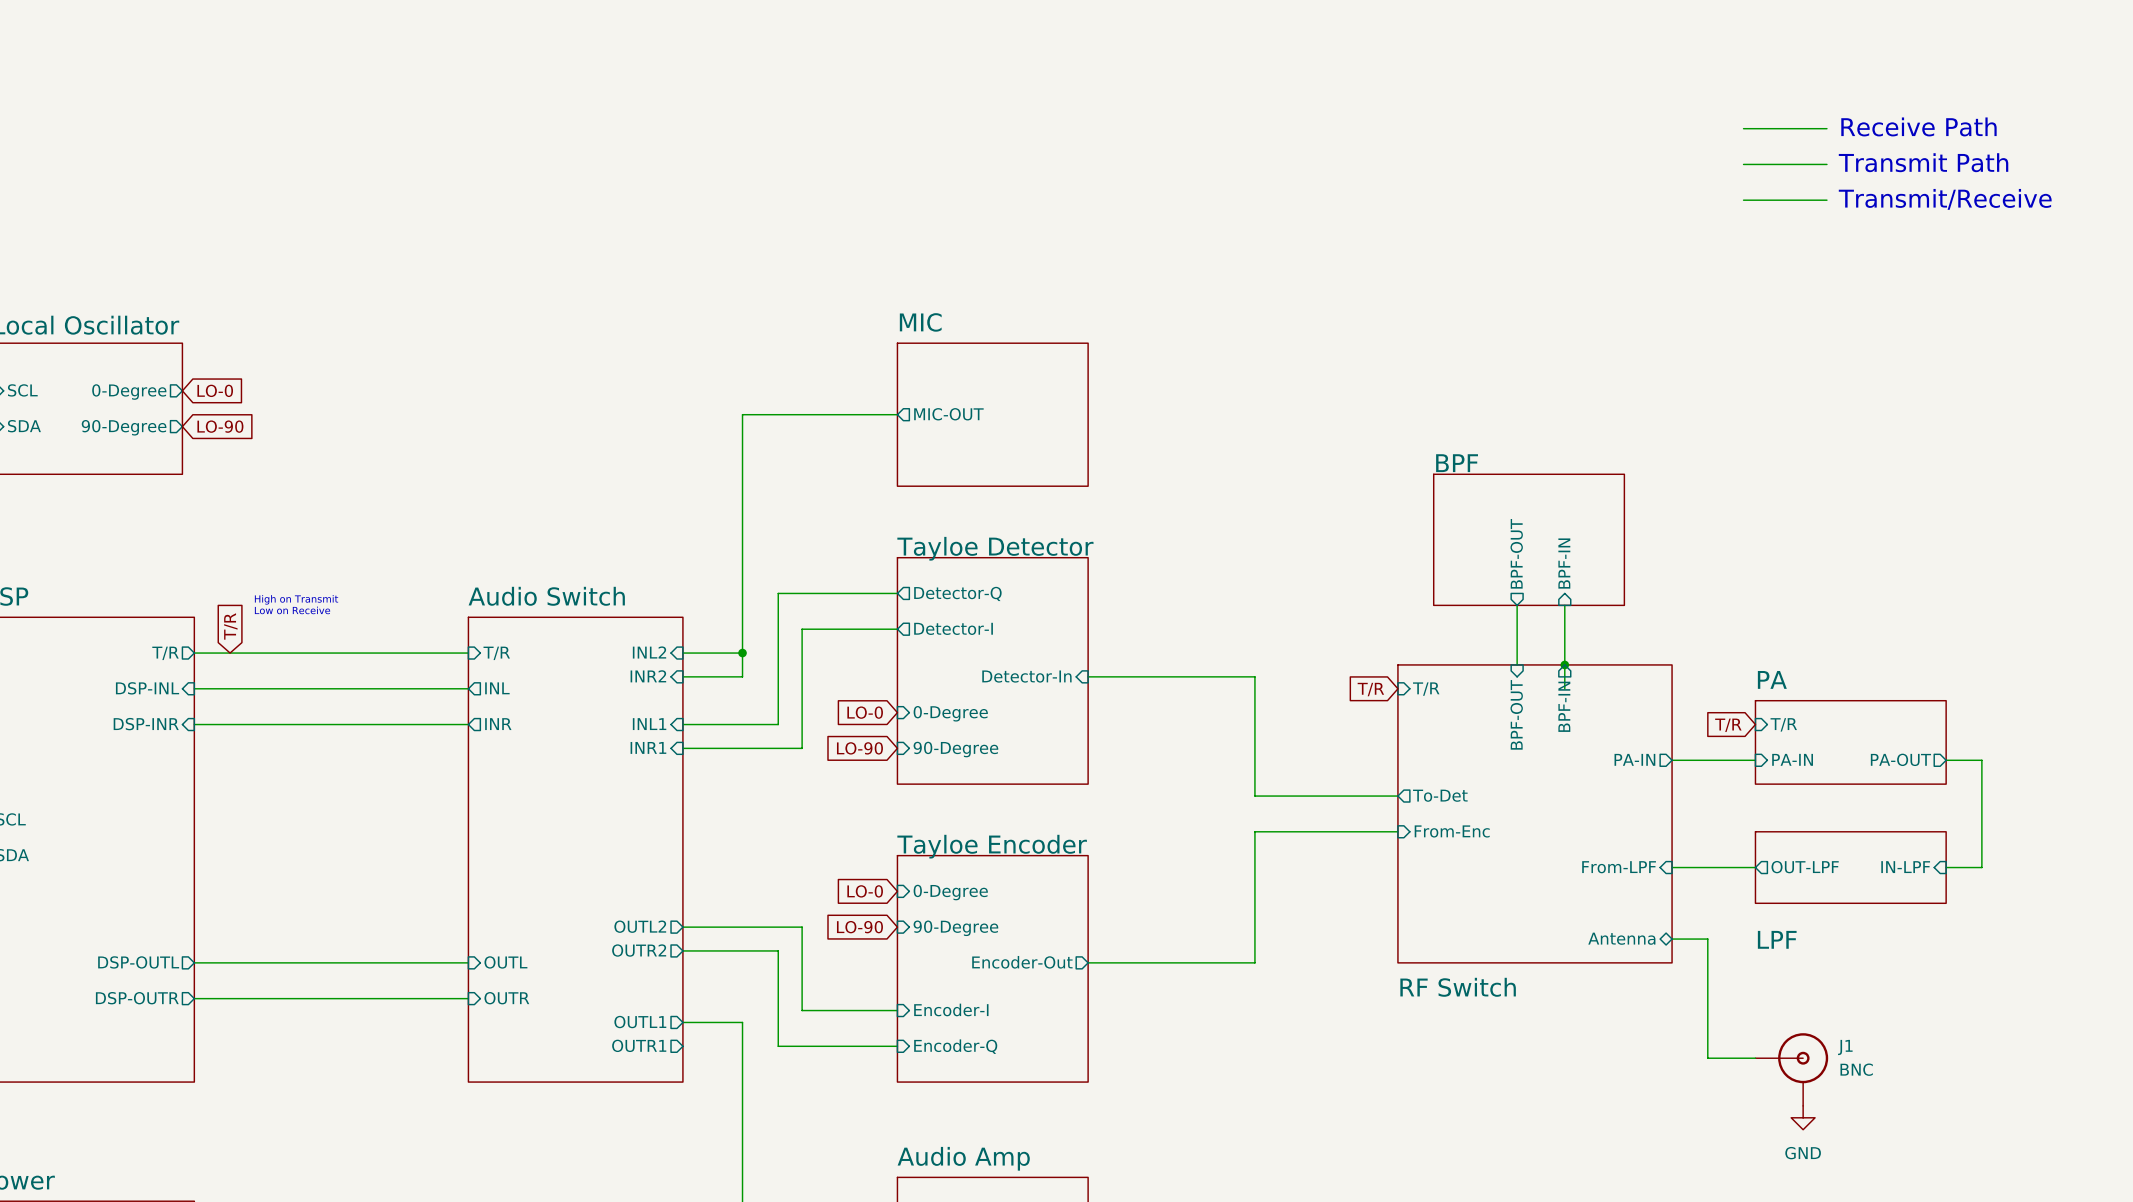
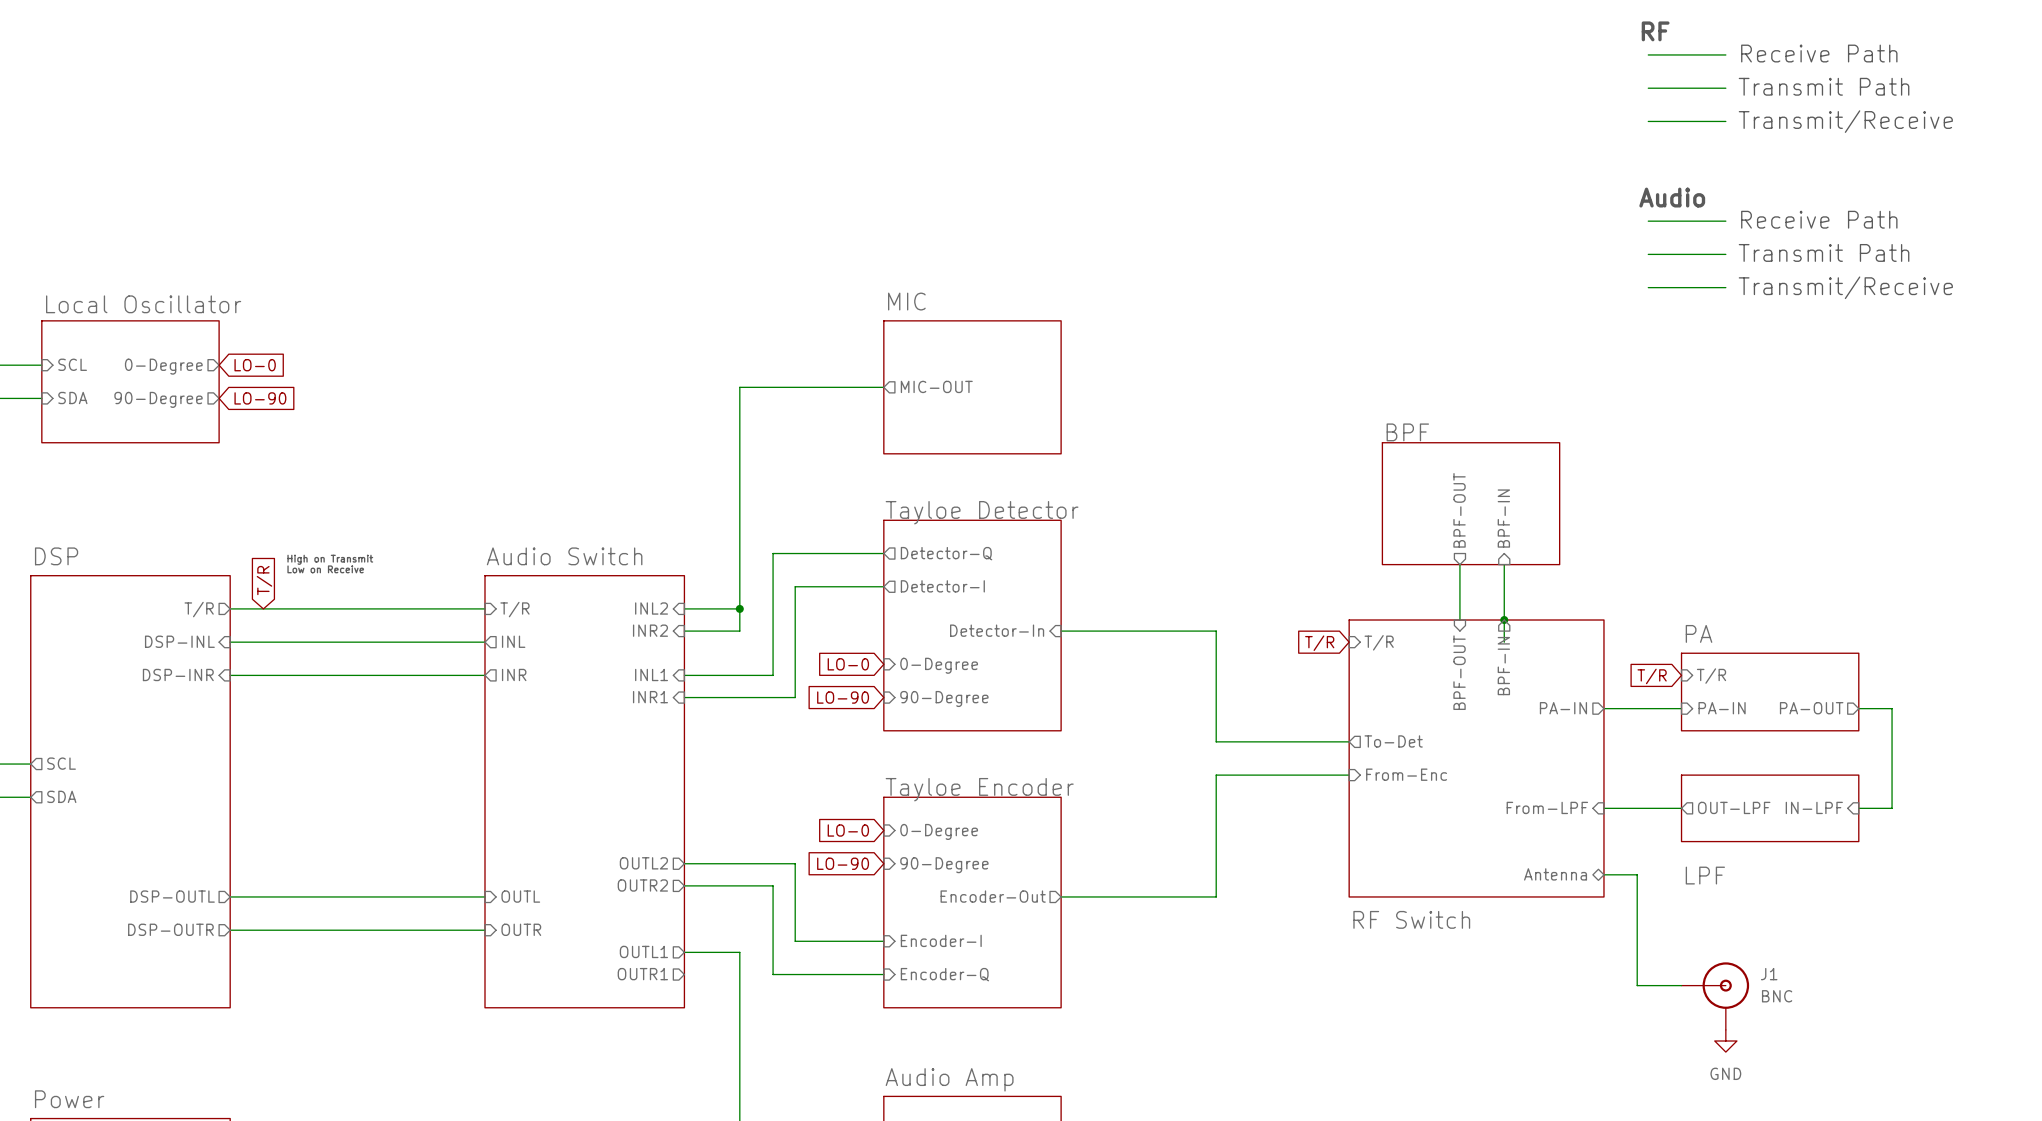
text: none -> RF (1655, 31)
text: none -> Receive Path (1819, 53)
wire: none -> (1648, 54) (1725, 54)
text: none -> Transmit Path (1824, 86)
wire: none -> (1648, 88) (1725, 88)
text: Receive Path (1918, 126) -> none
text: none -> Transmit/Receive (1845, 121)
wire: (1803, 128) (1826, 128) -> (1648, 121) (1670, 121)
text: Transmit Path (1923, 162) -> none
wire: (1743, 164) (1826, 164) -> (1648, 221) (1725, 221)
text: Transmit/Receive (1945, 199) -> none
wire: (1743, 200) (1826, 200) -> (1648, 254) (1725, 254)
text: none -> Audio (1672, 197)
text: none -> Receive Path (1819, 219)
text: none -> Transmit Path (1824, 252)
text: none -> Transmit/Receive (1845, 287)
wire: none -> (1648, 287) (1725, 287)

